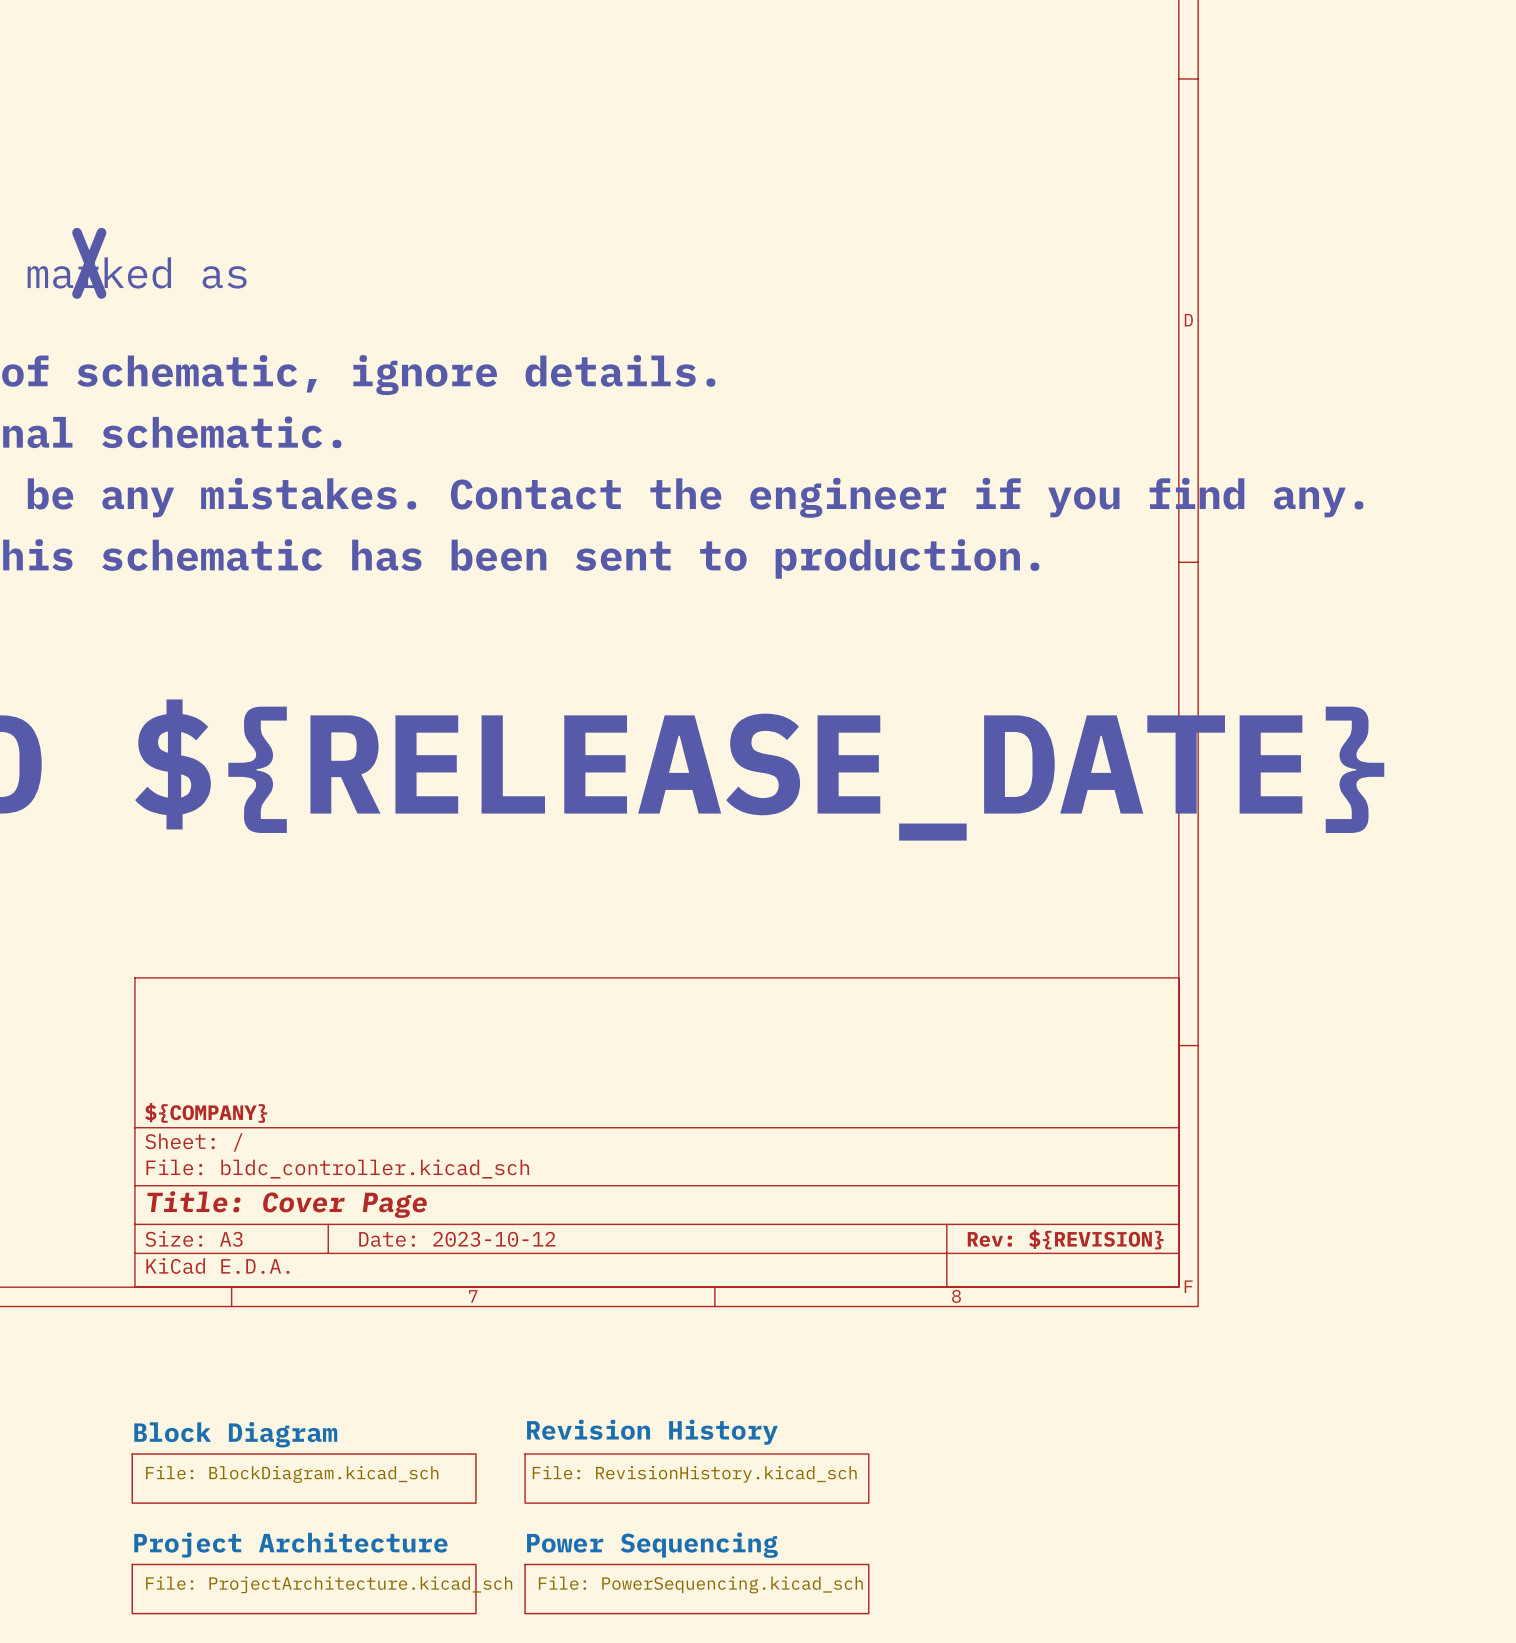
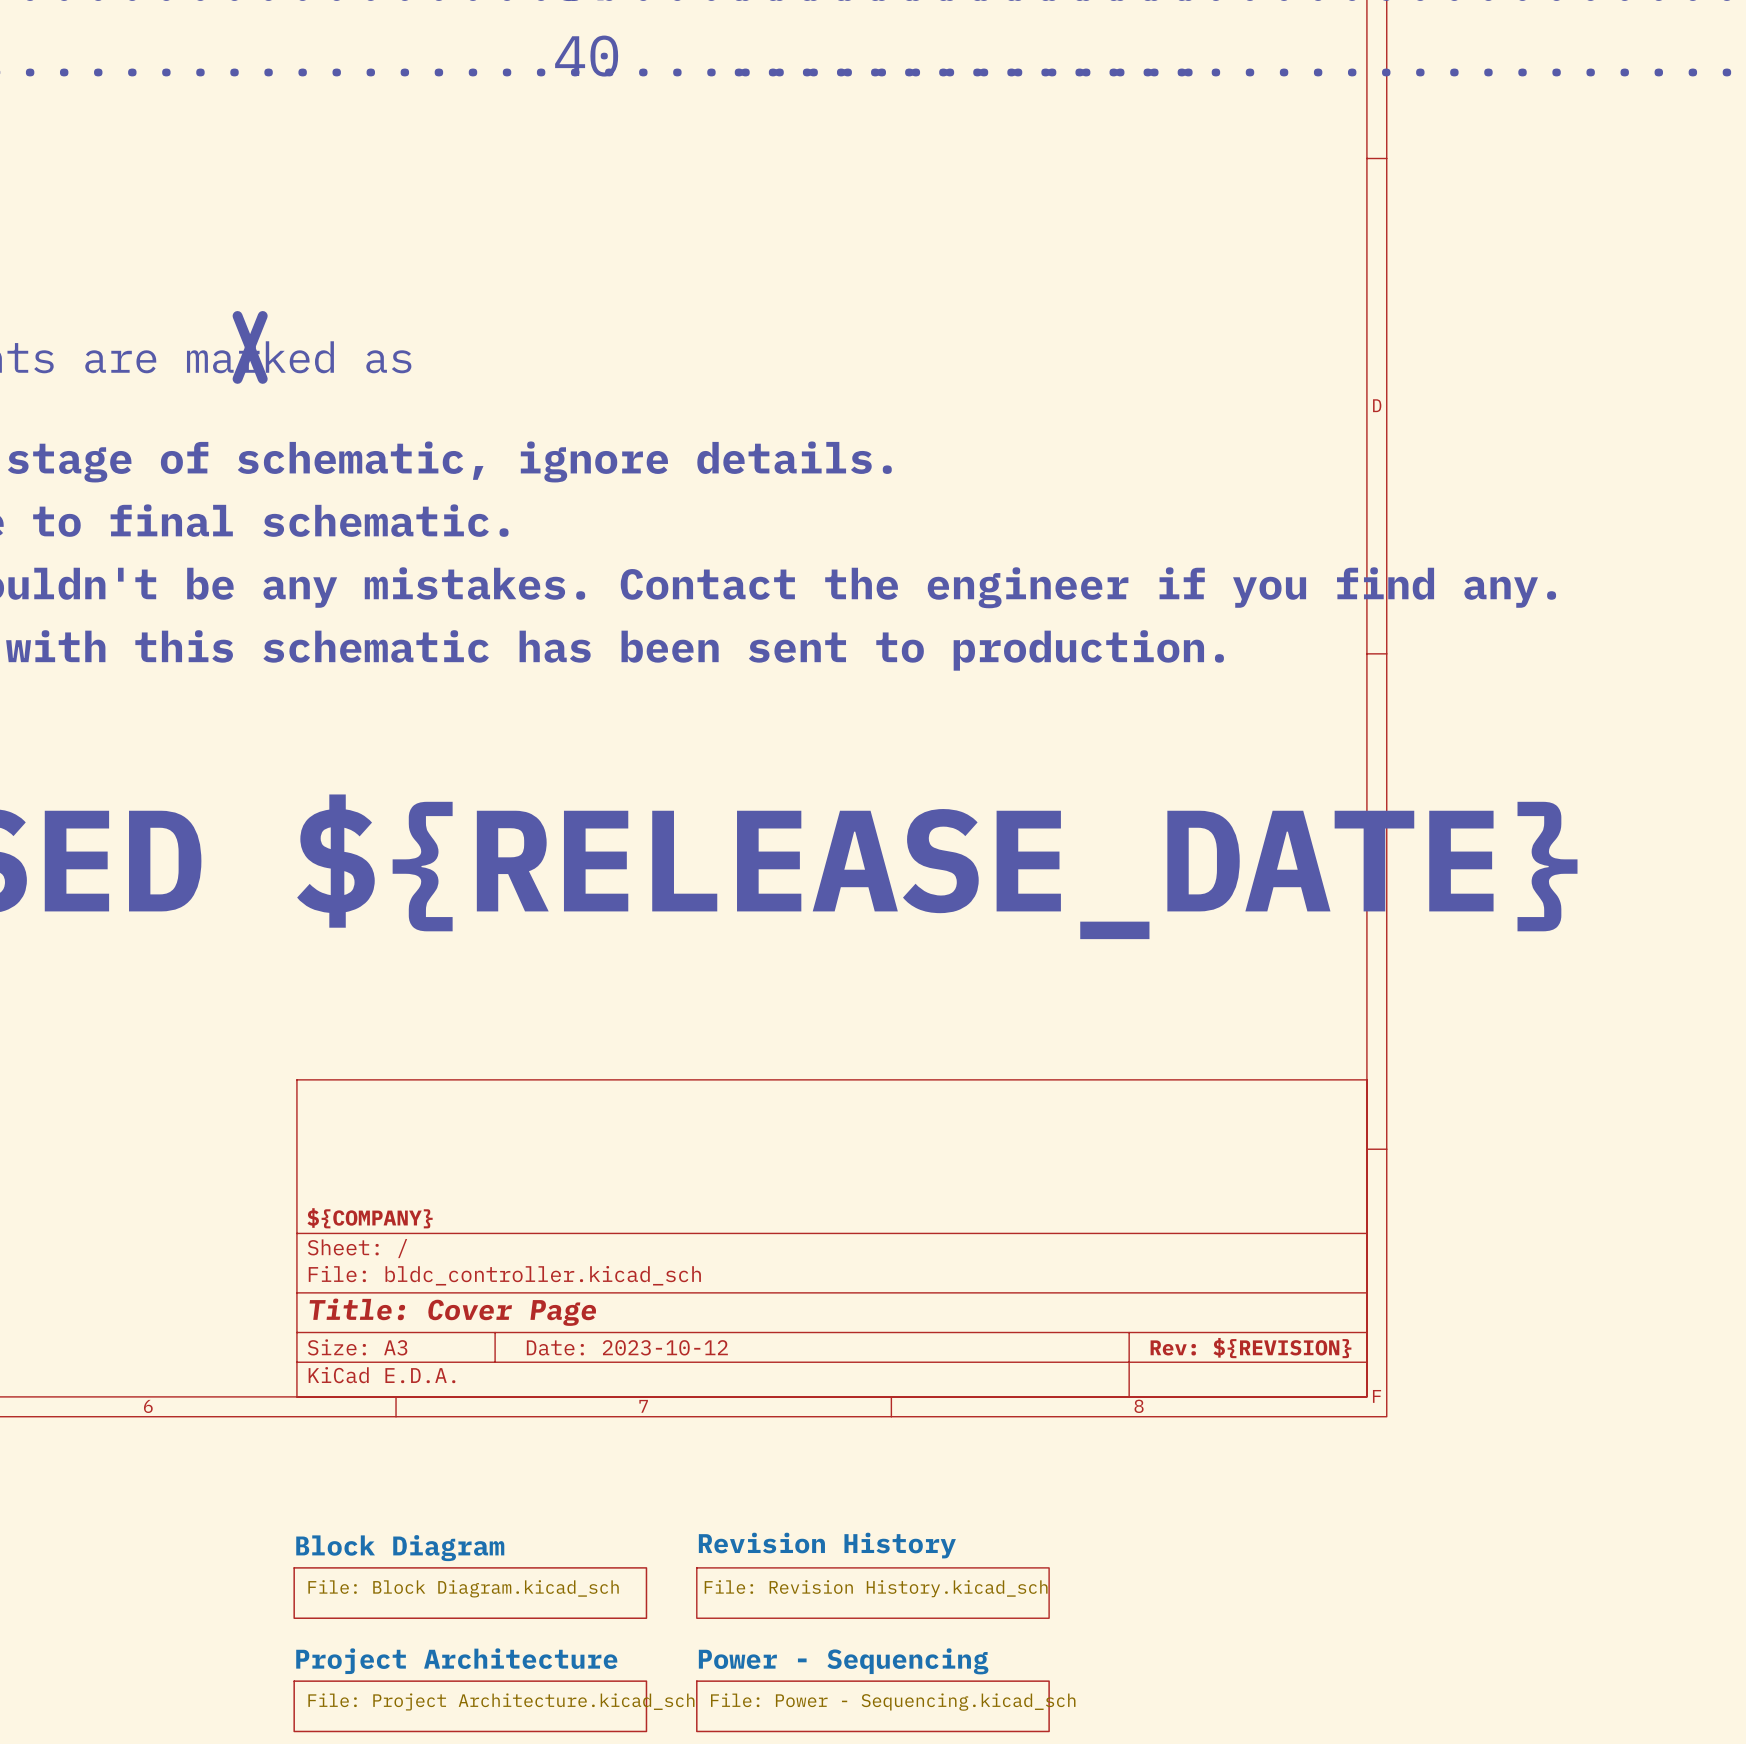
sheet Block Diagram value: File: BlockDiagram.kicad_sch (292, 1474) -> File: Block Diagram.kicad_sch (463, 1588)
sheet Revision History value: File: RevisionHistory.kicad_sch (694, 1474) -> File: Revision History.kicad_sch (876, 1588)
sheet Power Sequencing name: Power Sequencing (652, 1545) -> Power - Sequencing (843, 1661)
sheet Project Architecture value: File: ProjectArchitecture.kicad_sch (329, 1584) -> File: Project Architecture.kicad_sch (501, 1701)
sheet Power Sequencing value: File: PowerSequencing.kicad_sch (700, 1584) -> File: Power - Sequencing.kicad_sch (893, 1702)

